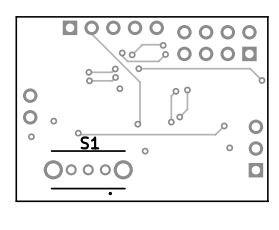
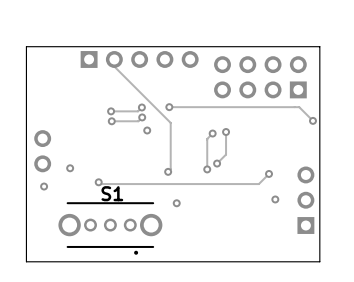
track: (163, 45) (142, 44) (132, 54) -> none
via: (163, 45) -> none
track: (122, 52) (122, 55) (127, 61) (158, 61) (165, 54) -> none
via: (122, 52) -> none
via: (132, 54) -> none
via: (165, 54) -> none

